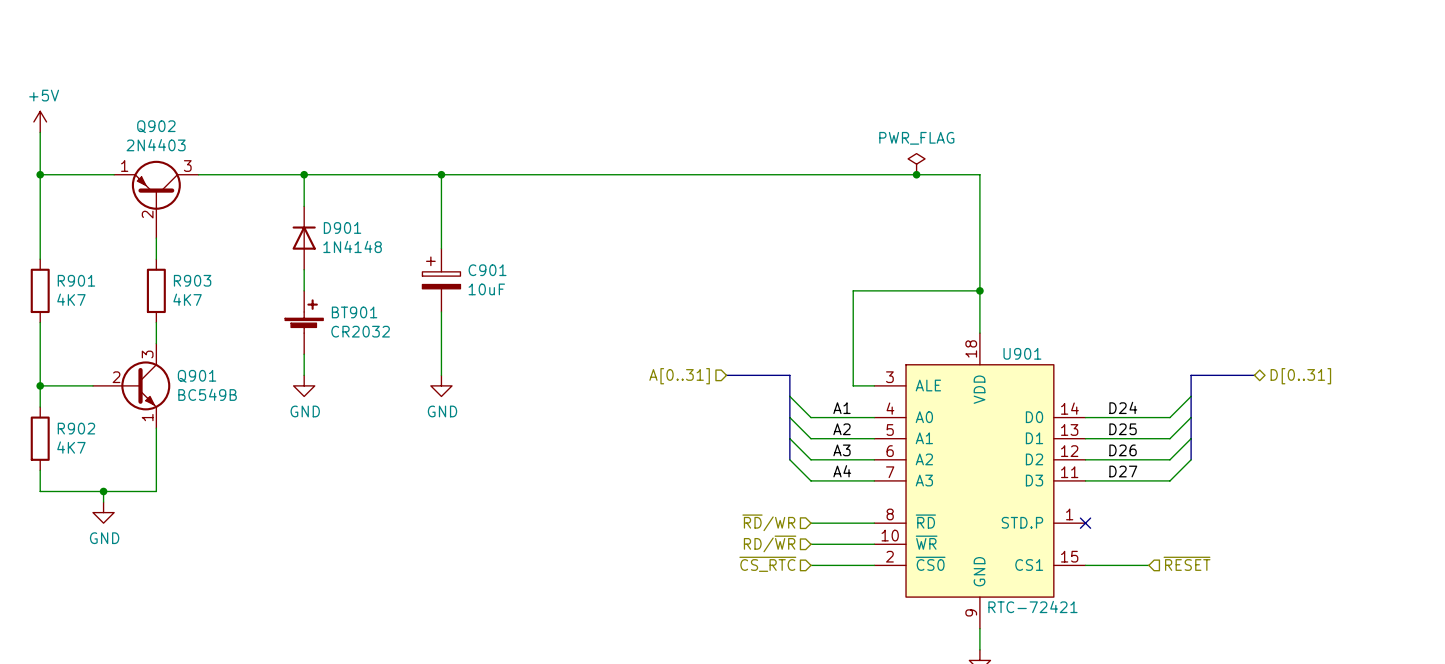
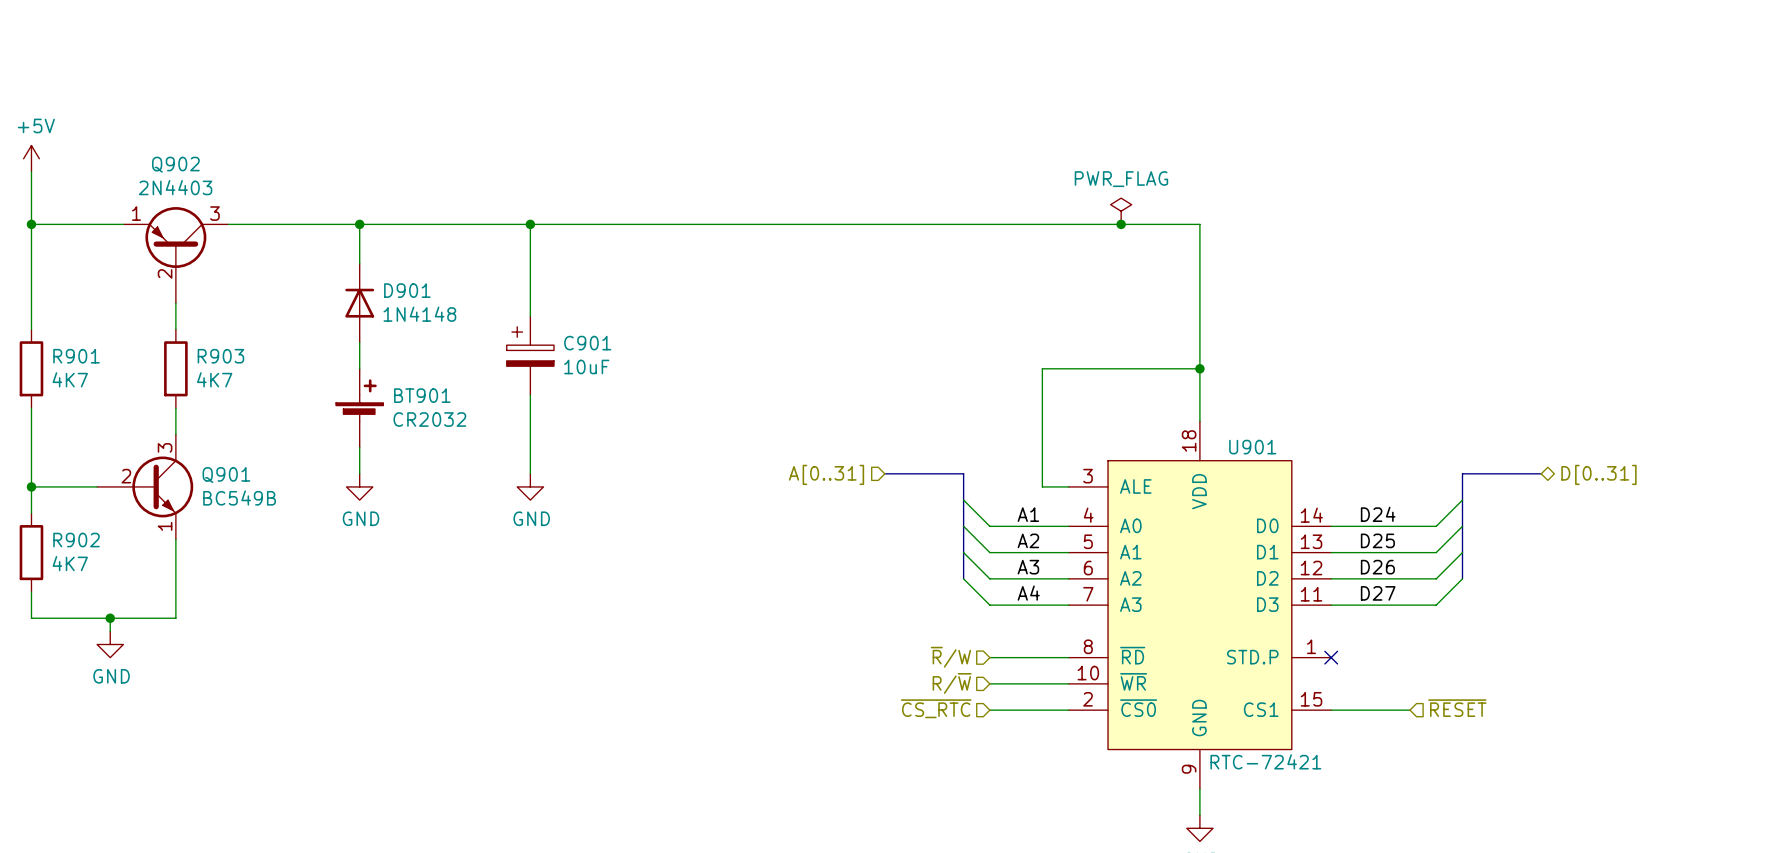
hierarchical label: ~{RD}/WR (768, 522) -> ~{R}/W (950, 657)
hierarchical label: RD/~{WR} (770, 543) -> R/~{W} (952, 683)

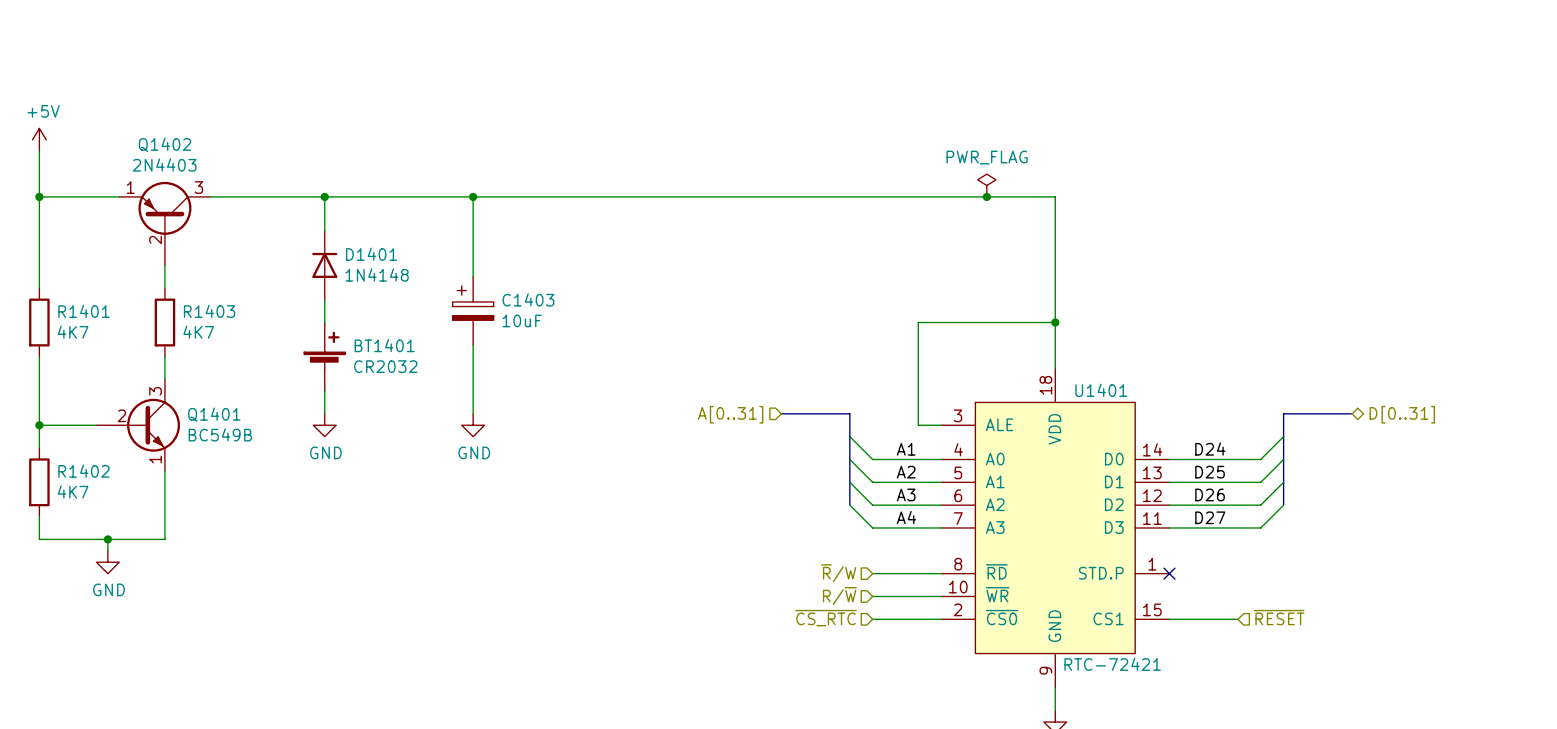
Q902 name: Q902 (175, 164) -> Q1402 (164, 144)
D901 name: D901 (407, 290) -> D1401 (371, 254)
C901 name: C901 (587, 343) -> C1403 (528, 299)
R901 name: R901 (76, 356) -> R1401 (83, 311)
R903 name: R903 (220, 356) -> R1403 (209, 311)
BT901 name: BT901 (422, 395) -> BT1401 (384, 345)
U901 name: U901 (1252, 447) -> U1401 (1101, 390)
Q901 name: Q901 (226, 475) -> Q1401 (214, 414)
R902 name: R902 (76, 540) -> R1402 (83, 471)

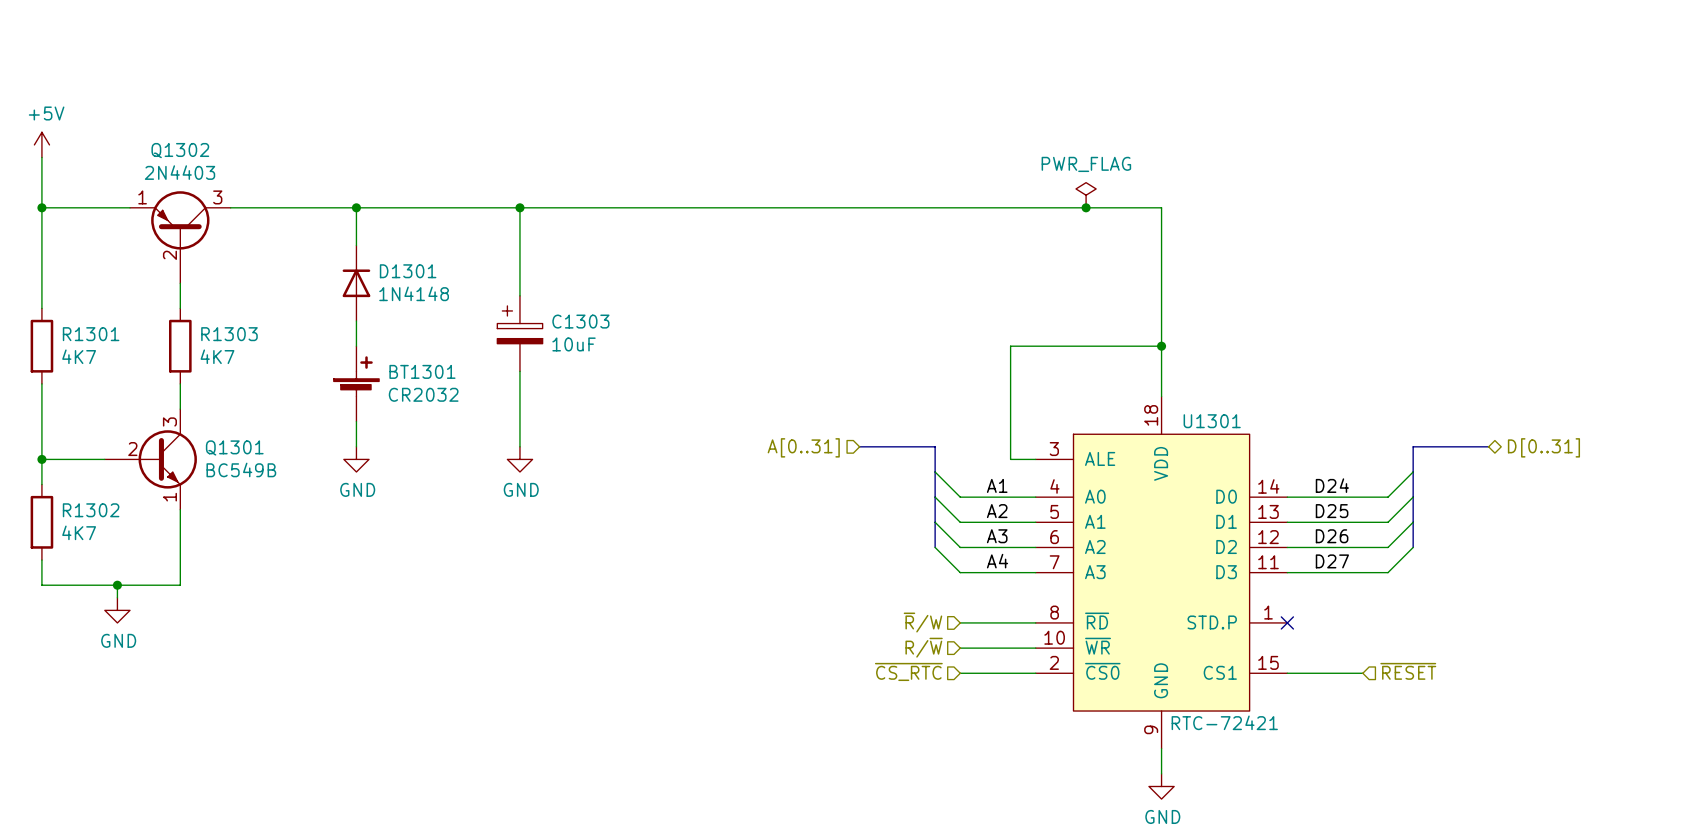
Q1402 name: Q1402 (164, 144) -> Q1302 (180, 150)
D1401 name: D1401 (371, 254) -> D1301 (408, 271)
C1403 name: C1403 (528, 299) -> C1303 (580, 321)
R1401 name: R1401 (83, 311) -> R1301 (91, 334)
R1403 name: R1403 (209, 311) -> R1303 (229, 334)
BT1401 name: BT1401 (384, 345) -> BT1301 (422, 371)
U1401 name: U1401 (1101, 390) -> U1301 (1212, 421)
Q1401 name: Q1401 (214, 414) -> Q1301 (234, 447)
R1402 name: R1402 (83, 471) -> R1302 (91, 510)

